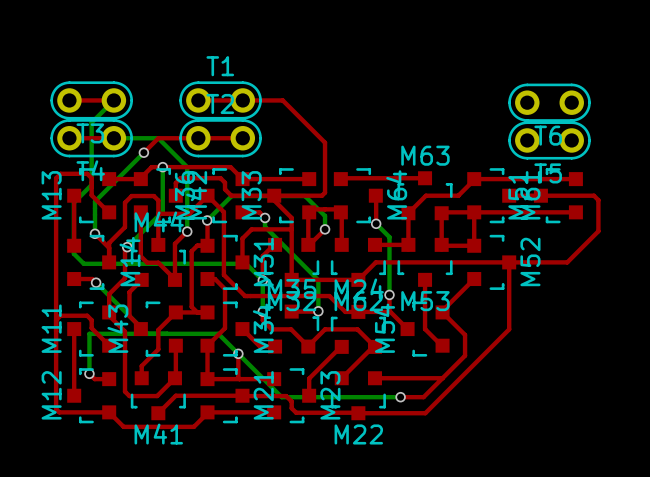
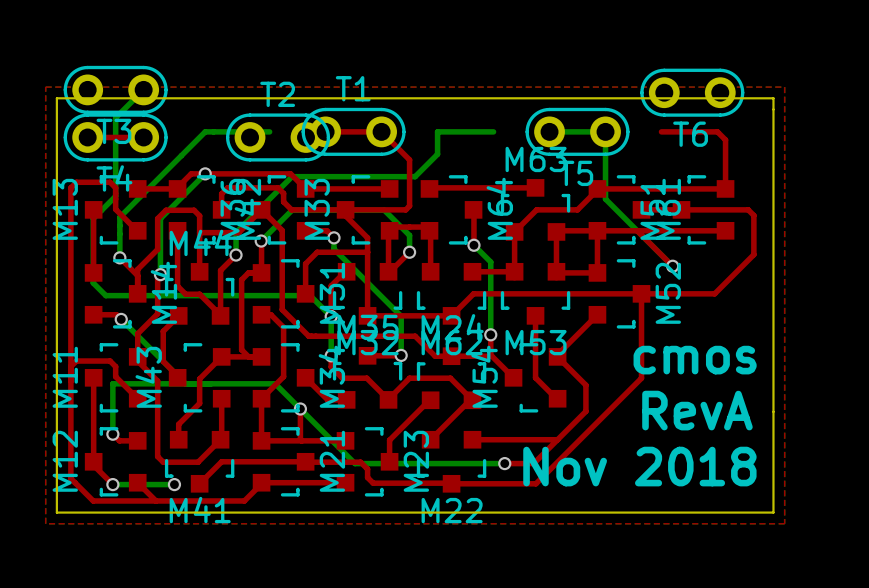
top zone outline: none -> (45, 87) (45, 523) (784, 523) (784, 87) (45, 87)
top track: (69, 100) (113, 100) -> none
top track: (198, 100) (282, 100) (325, 142) (325, 156) -> (325, 131) (381, 131) (409, 159)
T1 position: (220, 100) -> (353, 131)
board edge: none -> (56, 98) (773, 98) (773, 512) (56, 512) (56, 98)
bottom track: none -> (269, 131) (205, 131) (181, 155)
bottom track: none -> (549, 131) (605, 131) (605, 199) (672, 266)
top track: none -> (661, 131) (717, 131) (725, 139) (725, 188)
bottom track: (113, 138) (158, 138) (187, 167) (187, 213) -> (493, 131) (437, 131) (437, 154) (415, 176) (292, 176) (236, 232)
top track: (242, 138) (158, 138) (143, 152) -> none
T5 position: (549, 140) -> (577, 131)
via: (143, 152) -> none
bottom track: (162, 167) (162, 211) (127, 247) -> (205, 173) (160, 218) (160, 274)
top track: none -> (637, 230) (672, 266)
via: none -> (672, 266)
text: none -> cmos (695, 360)
text: none -> RevA (697, 410)
top track: none -> (93, 461) (93, 465) (112, 484)
text: none -> Nov 2018 (639, 466)
top track: (59, 412) (109, 412) -> (75, 482) (93, 500) (155, 500)
bottom track: none -> (112, 484) (174, 484)
via: none -> (112, 484)
via: none -> (174, 484)

